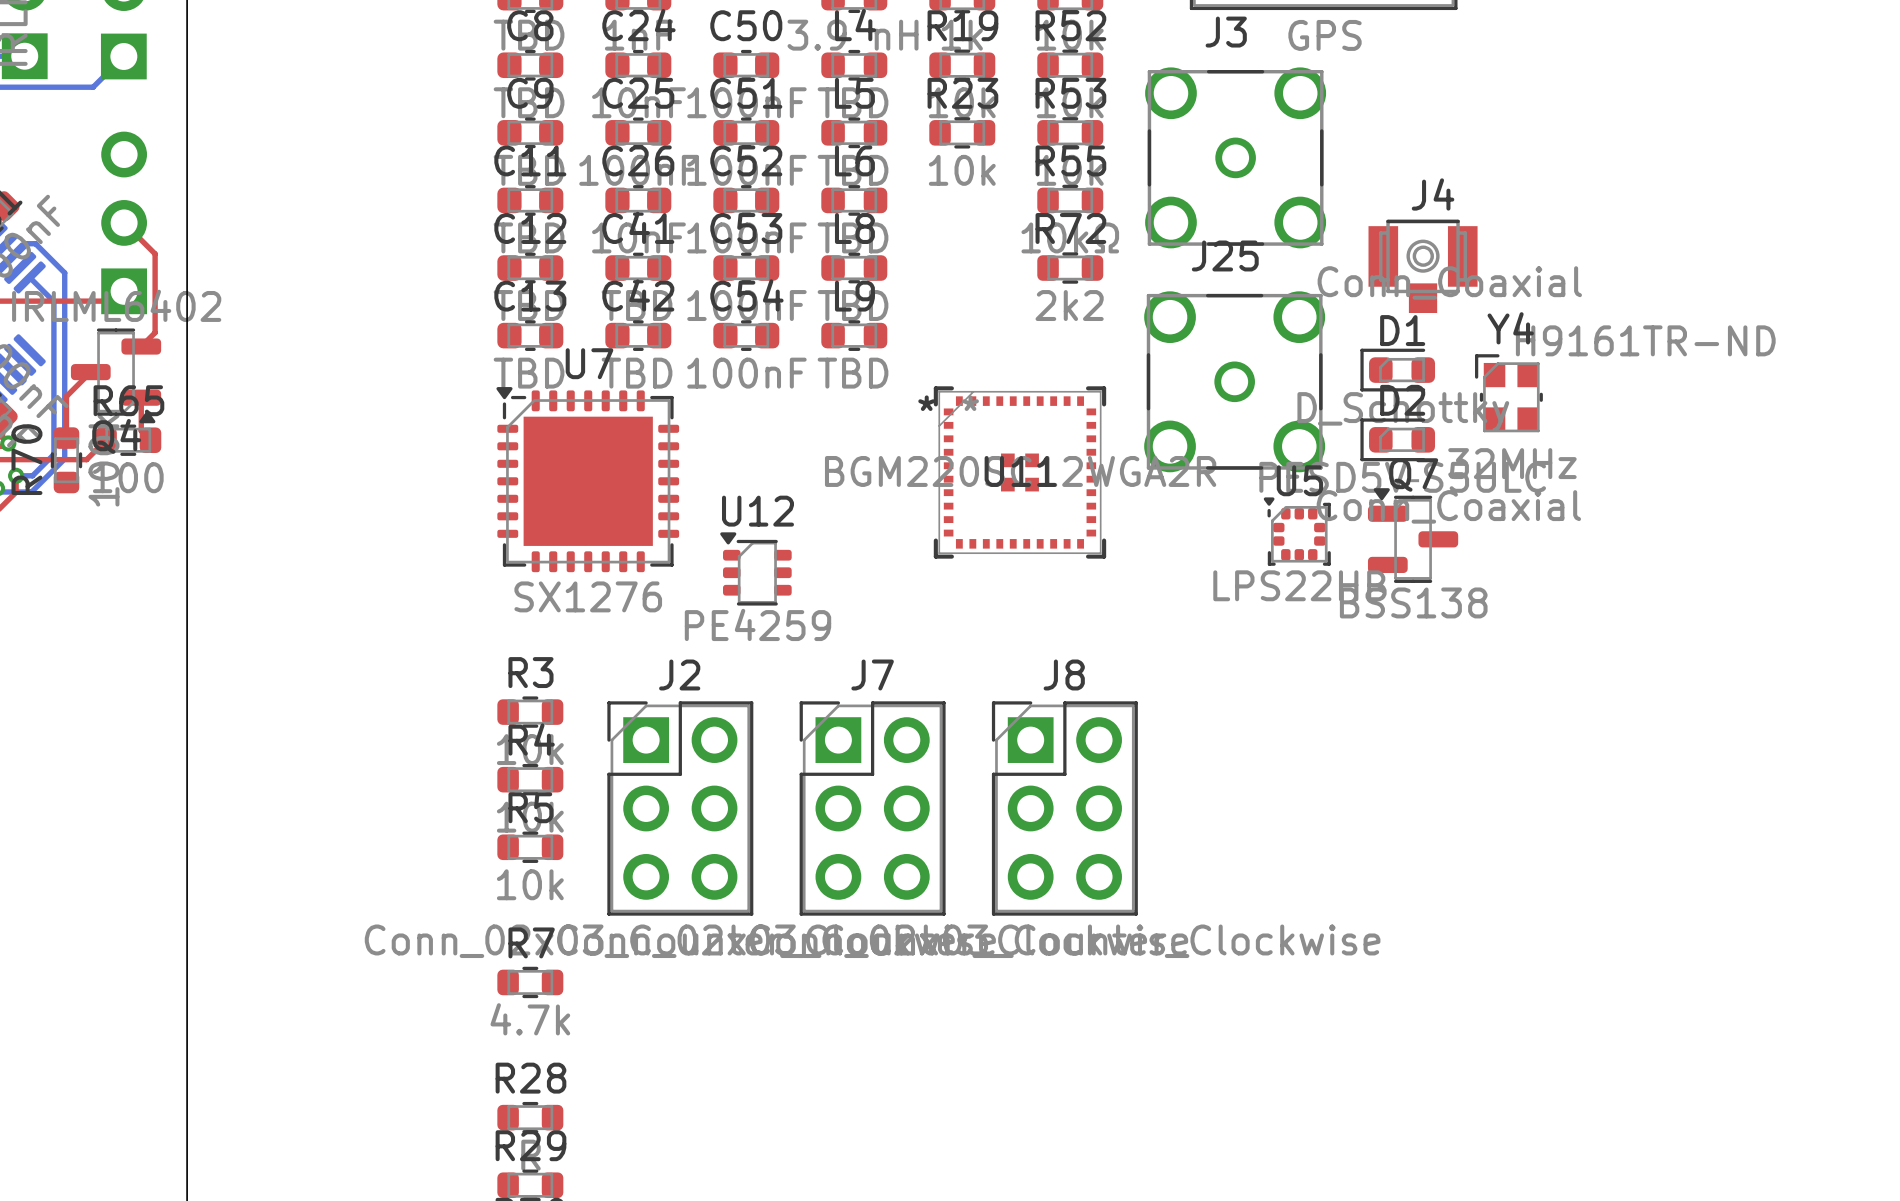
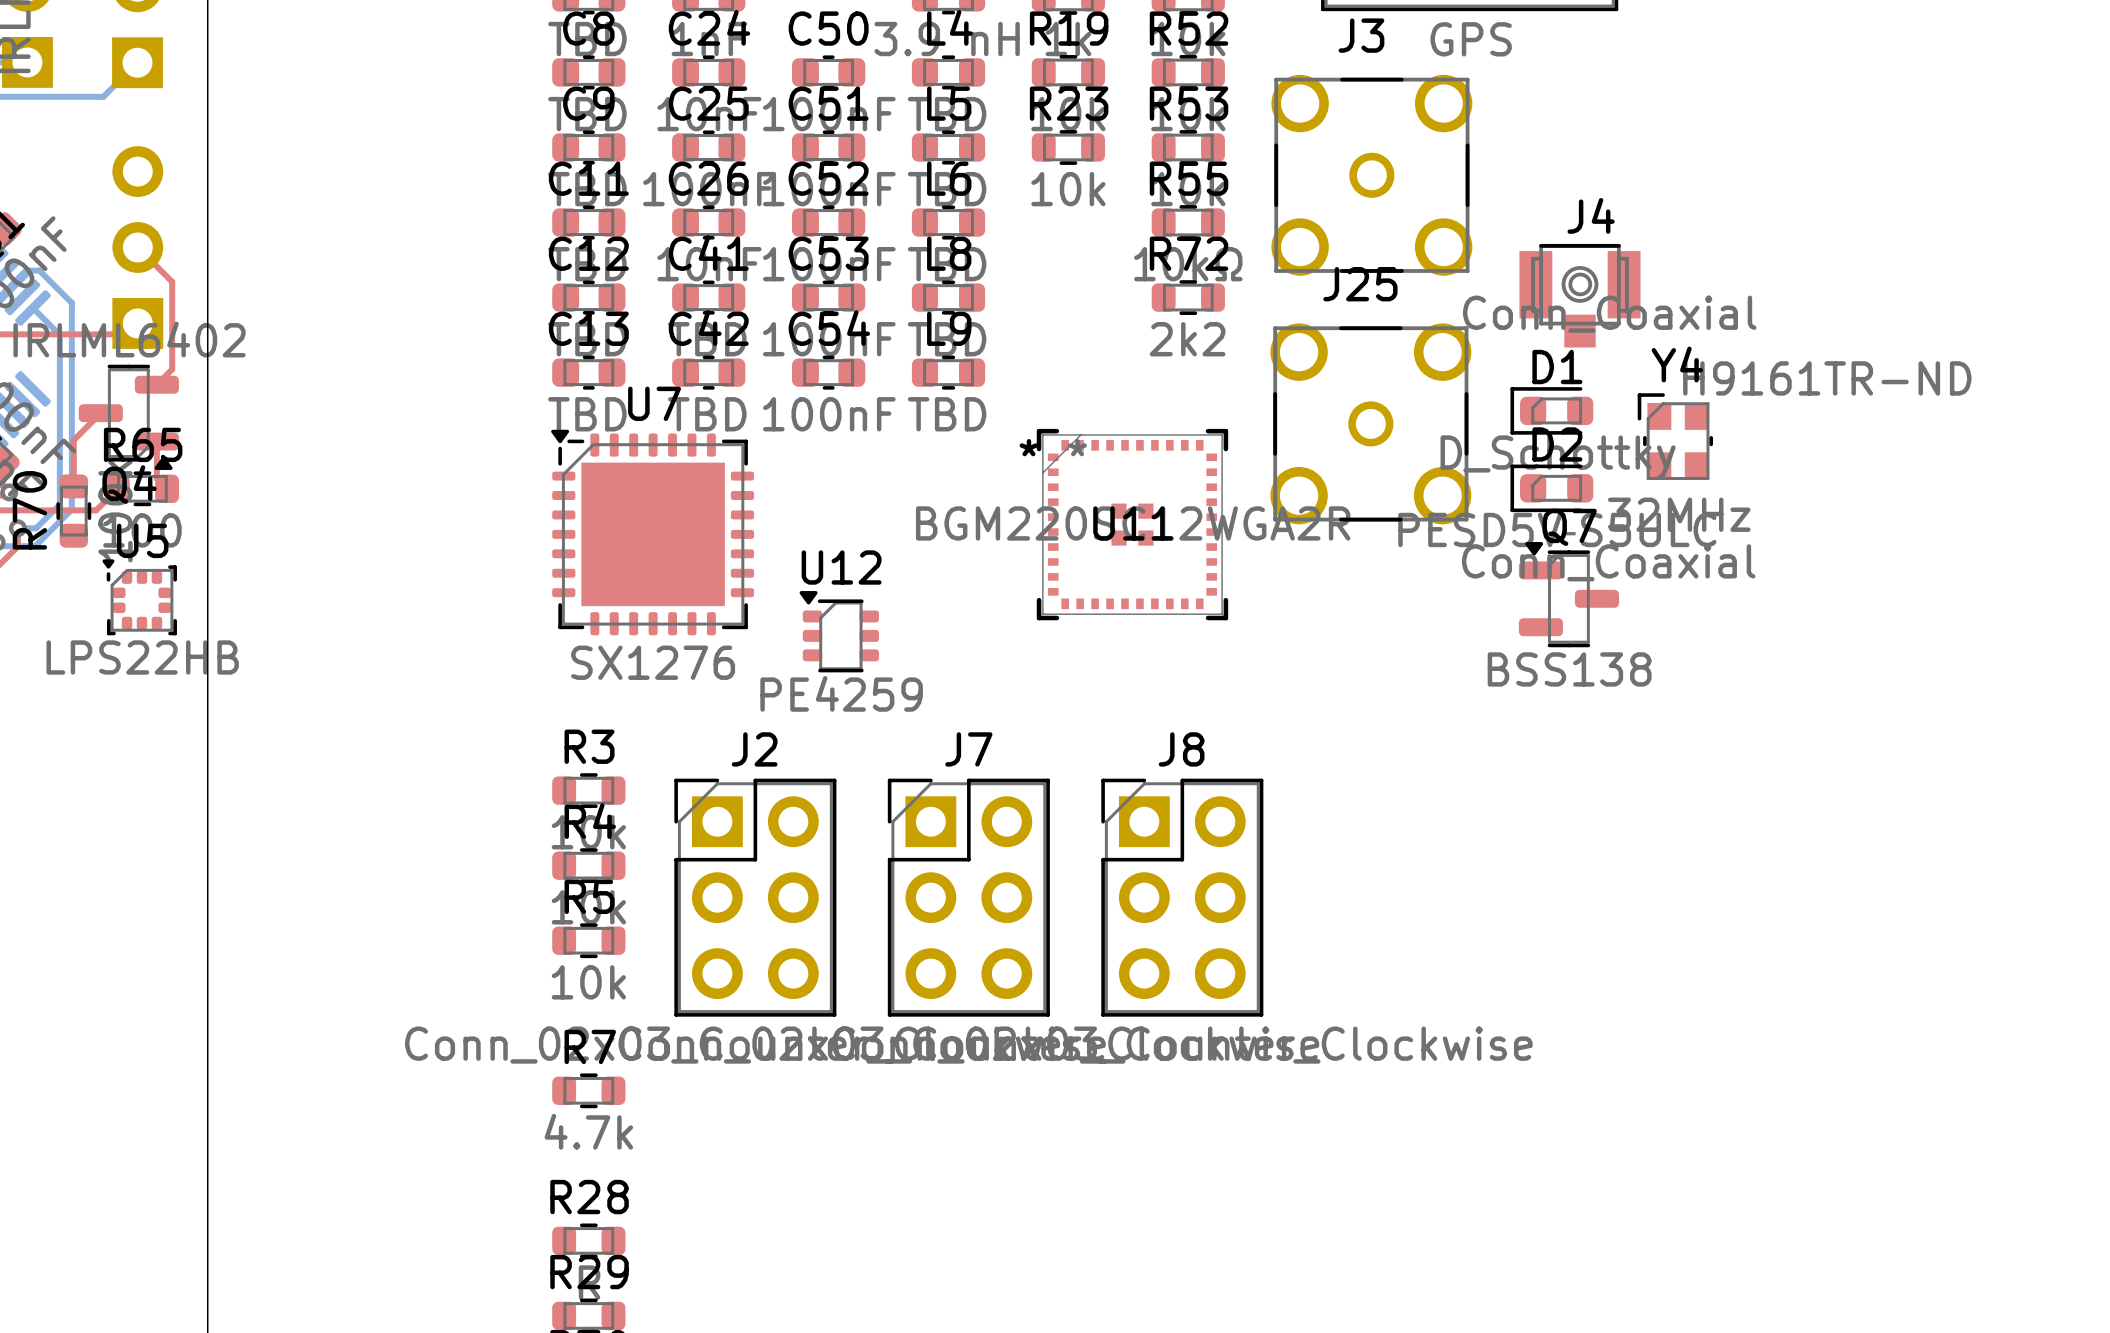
U5 position: (1297, 531) -> (139, 597)

